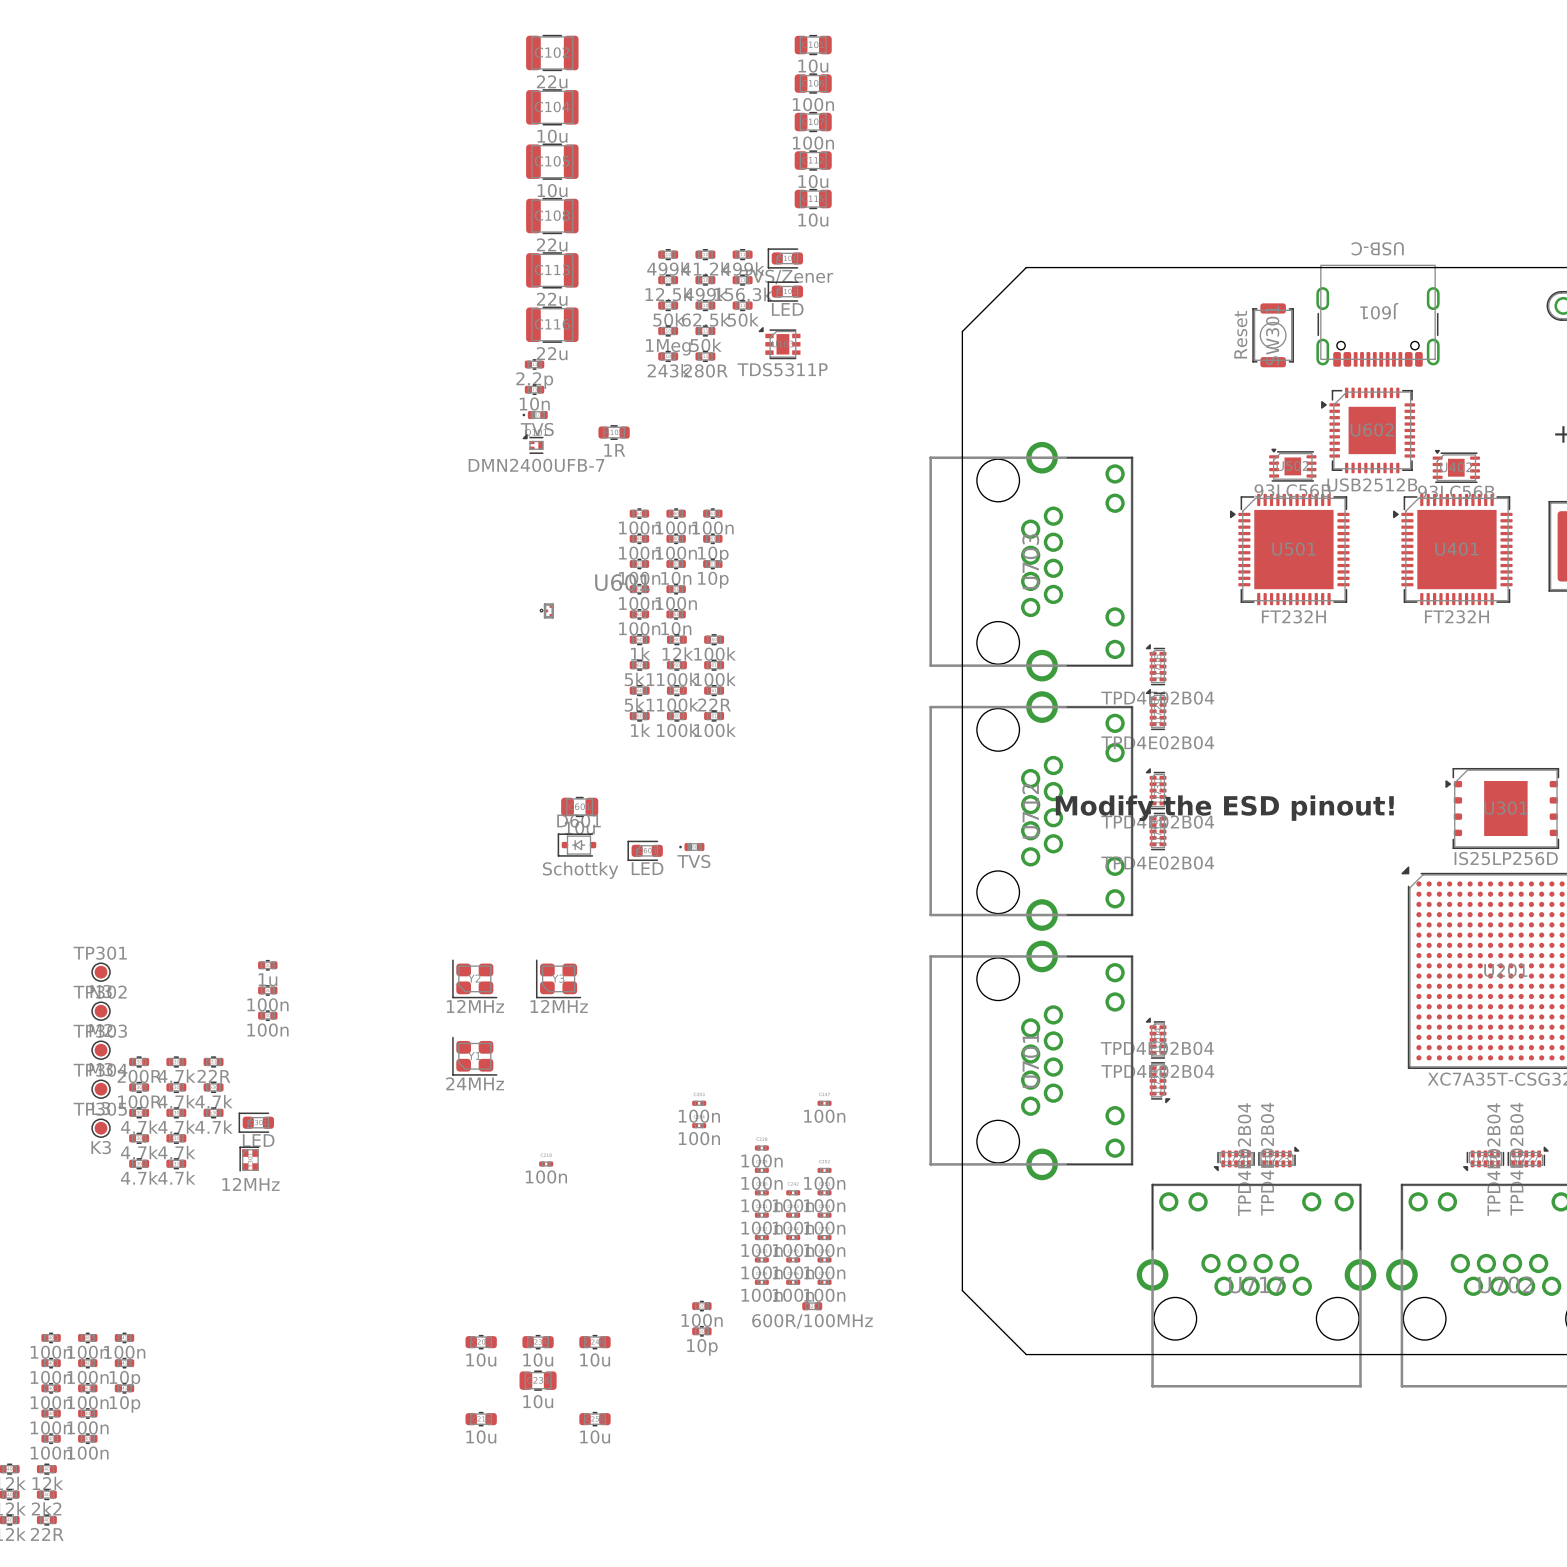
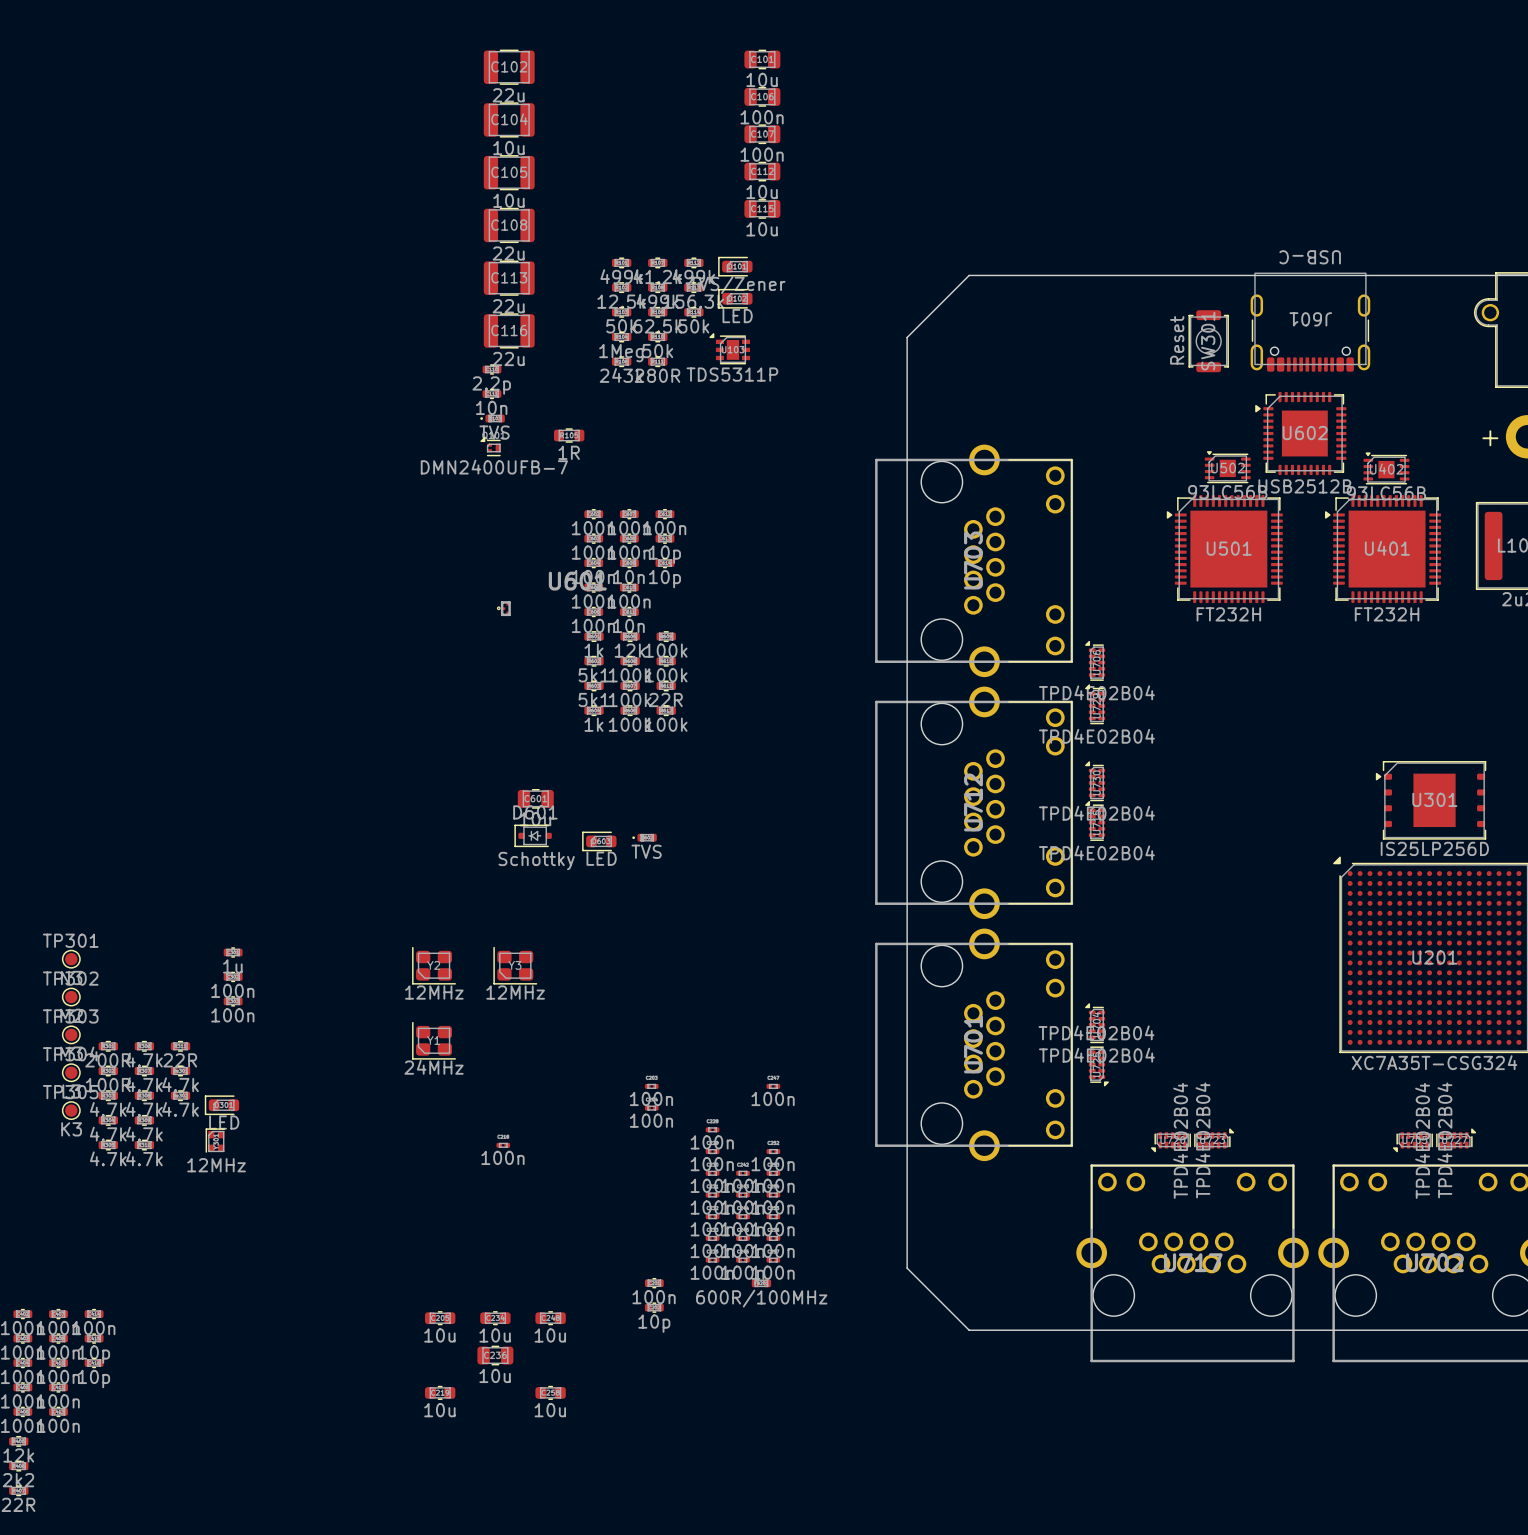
text: Modify the ESD pinout! (1224, 808) -> none

